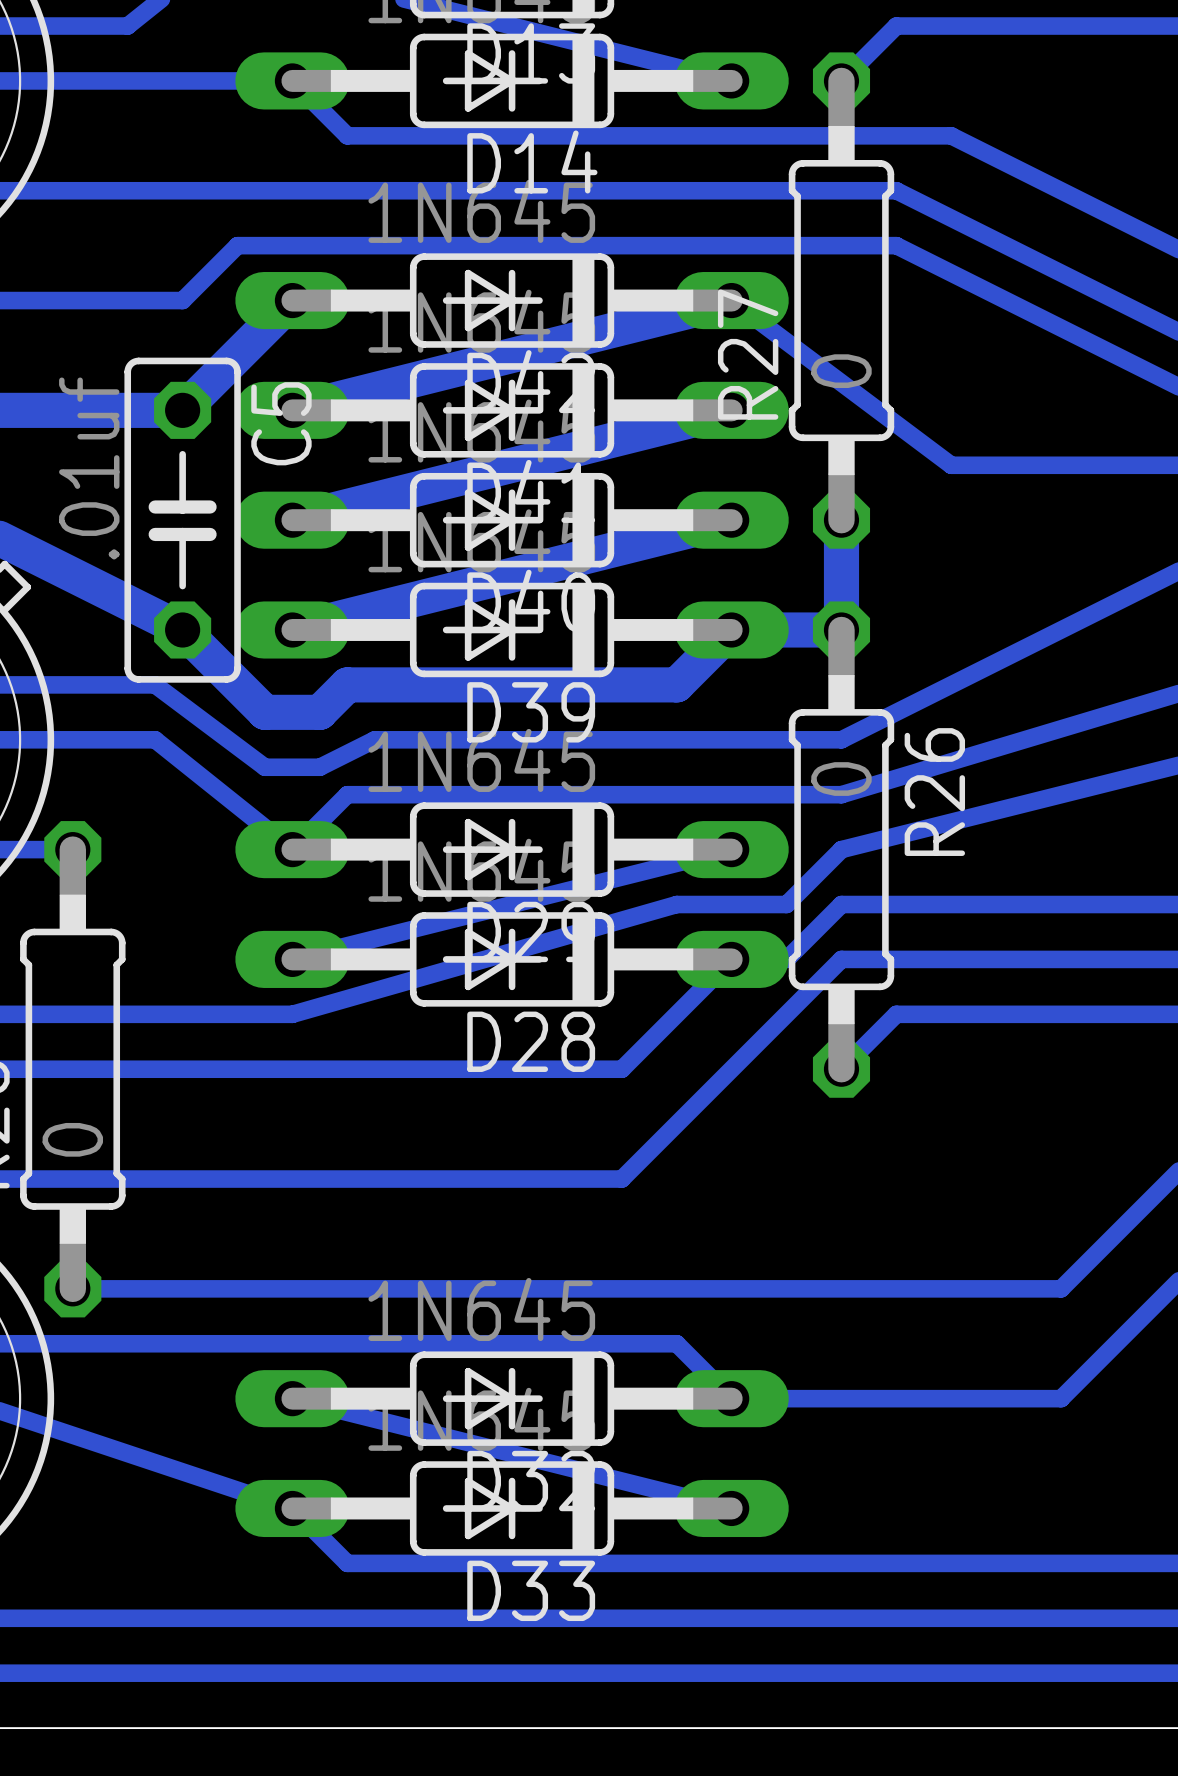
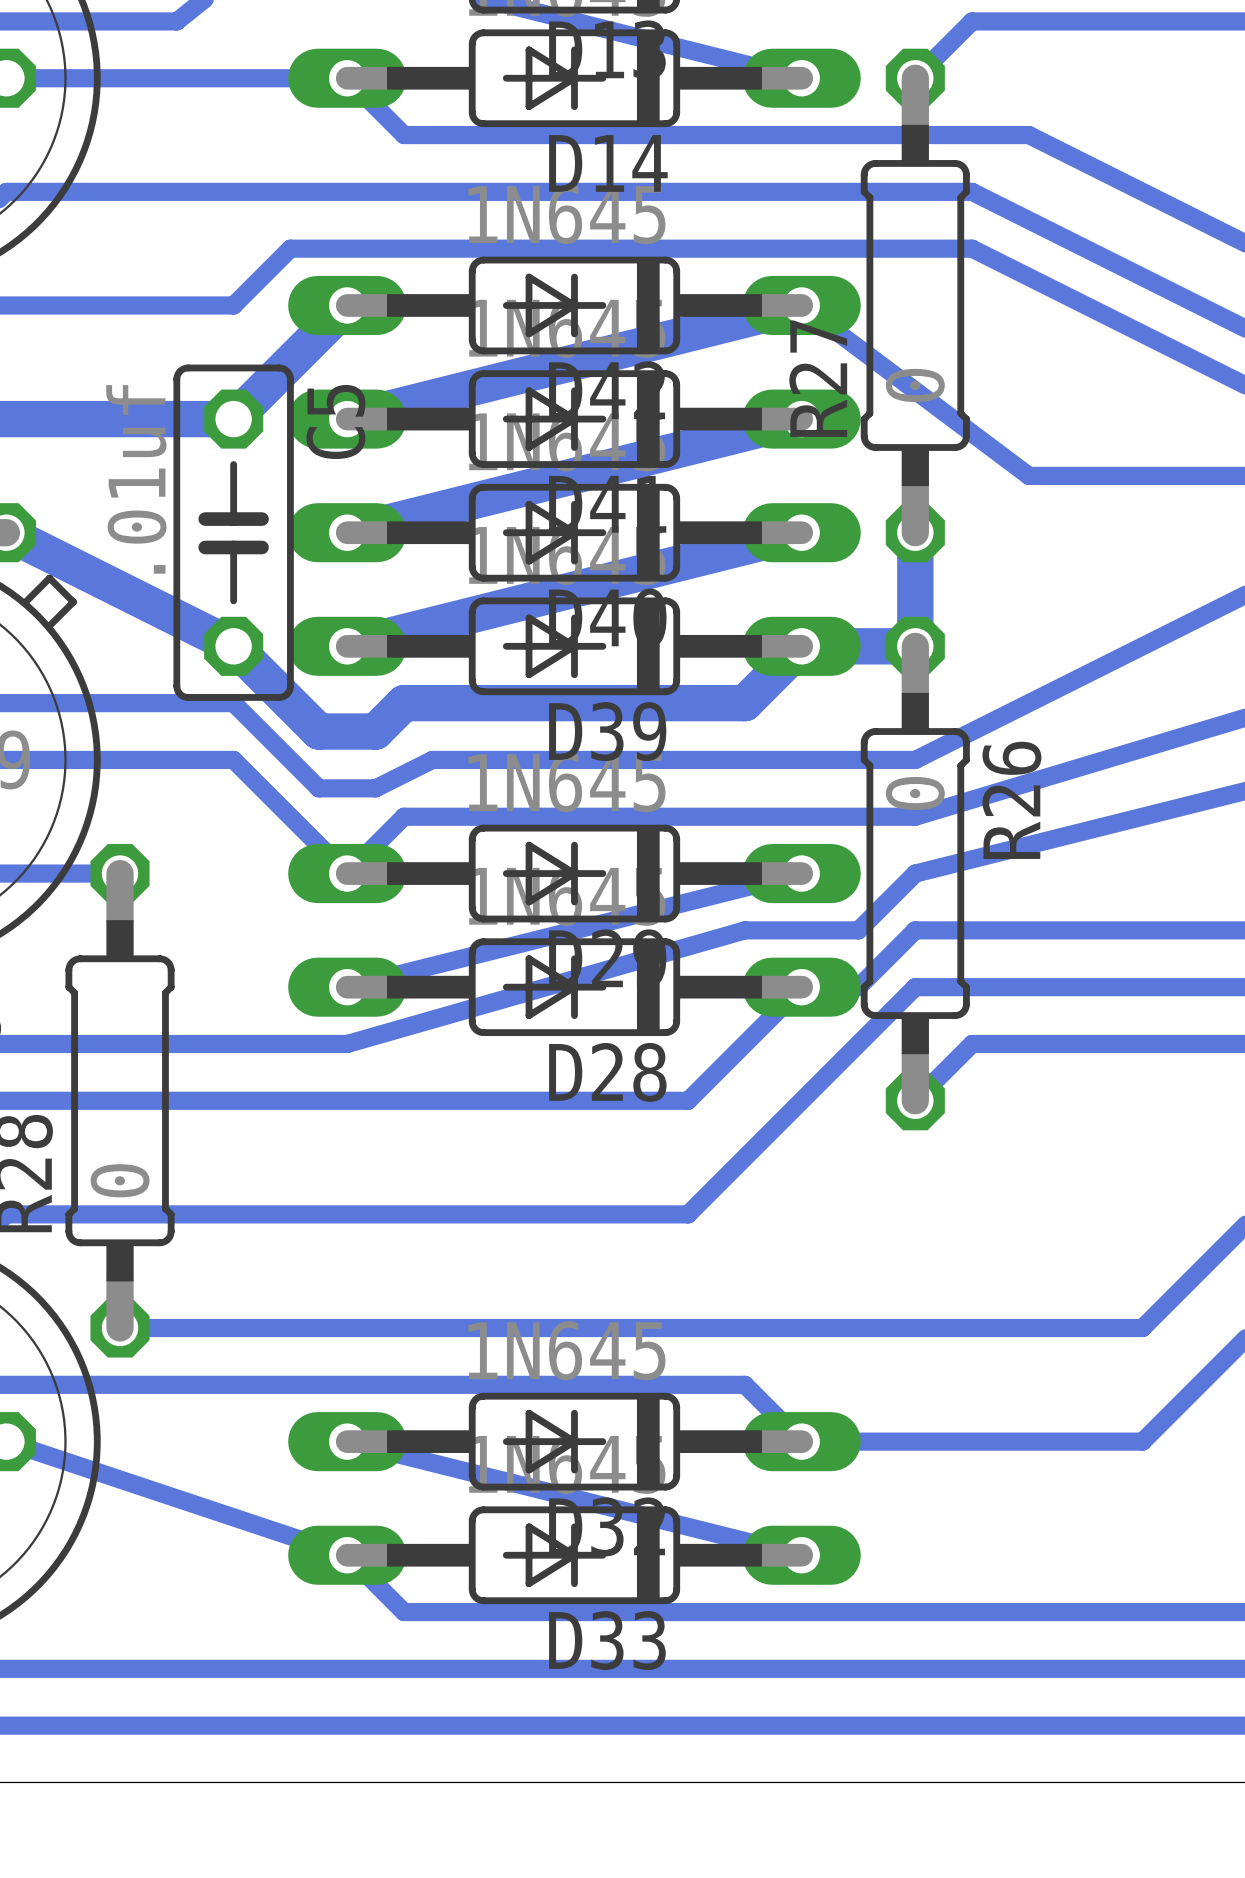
bottom track: (155, 684) (264, 767) -> (205, 703) (233, 703) (318, 788)
bottom track: (155, 739) (292, 849) -> (205, 759) (233, 759) (347, 873)

